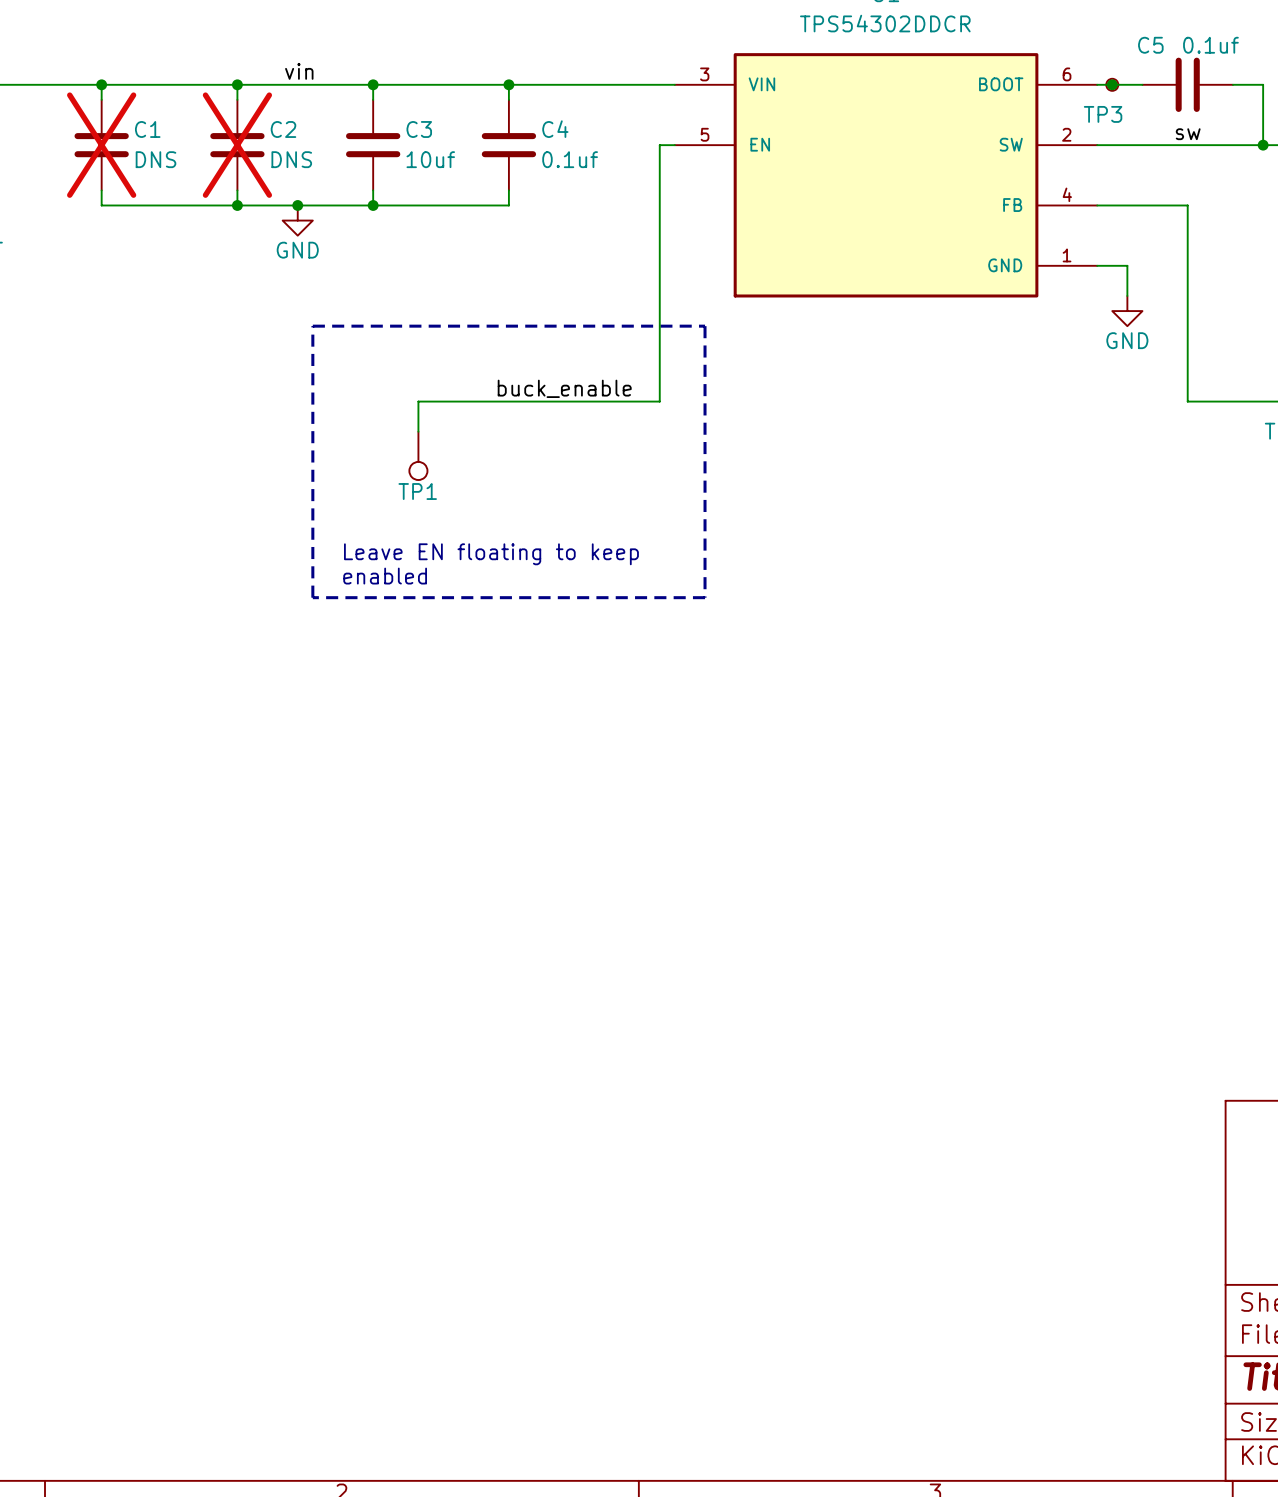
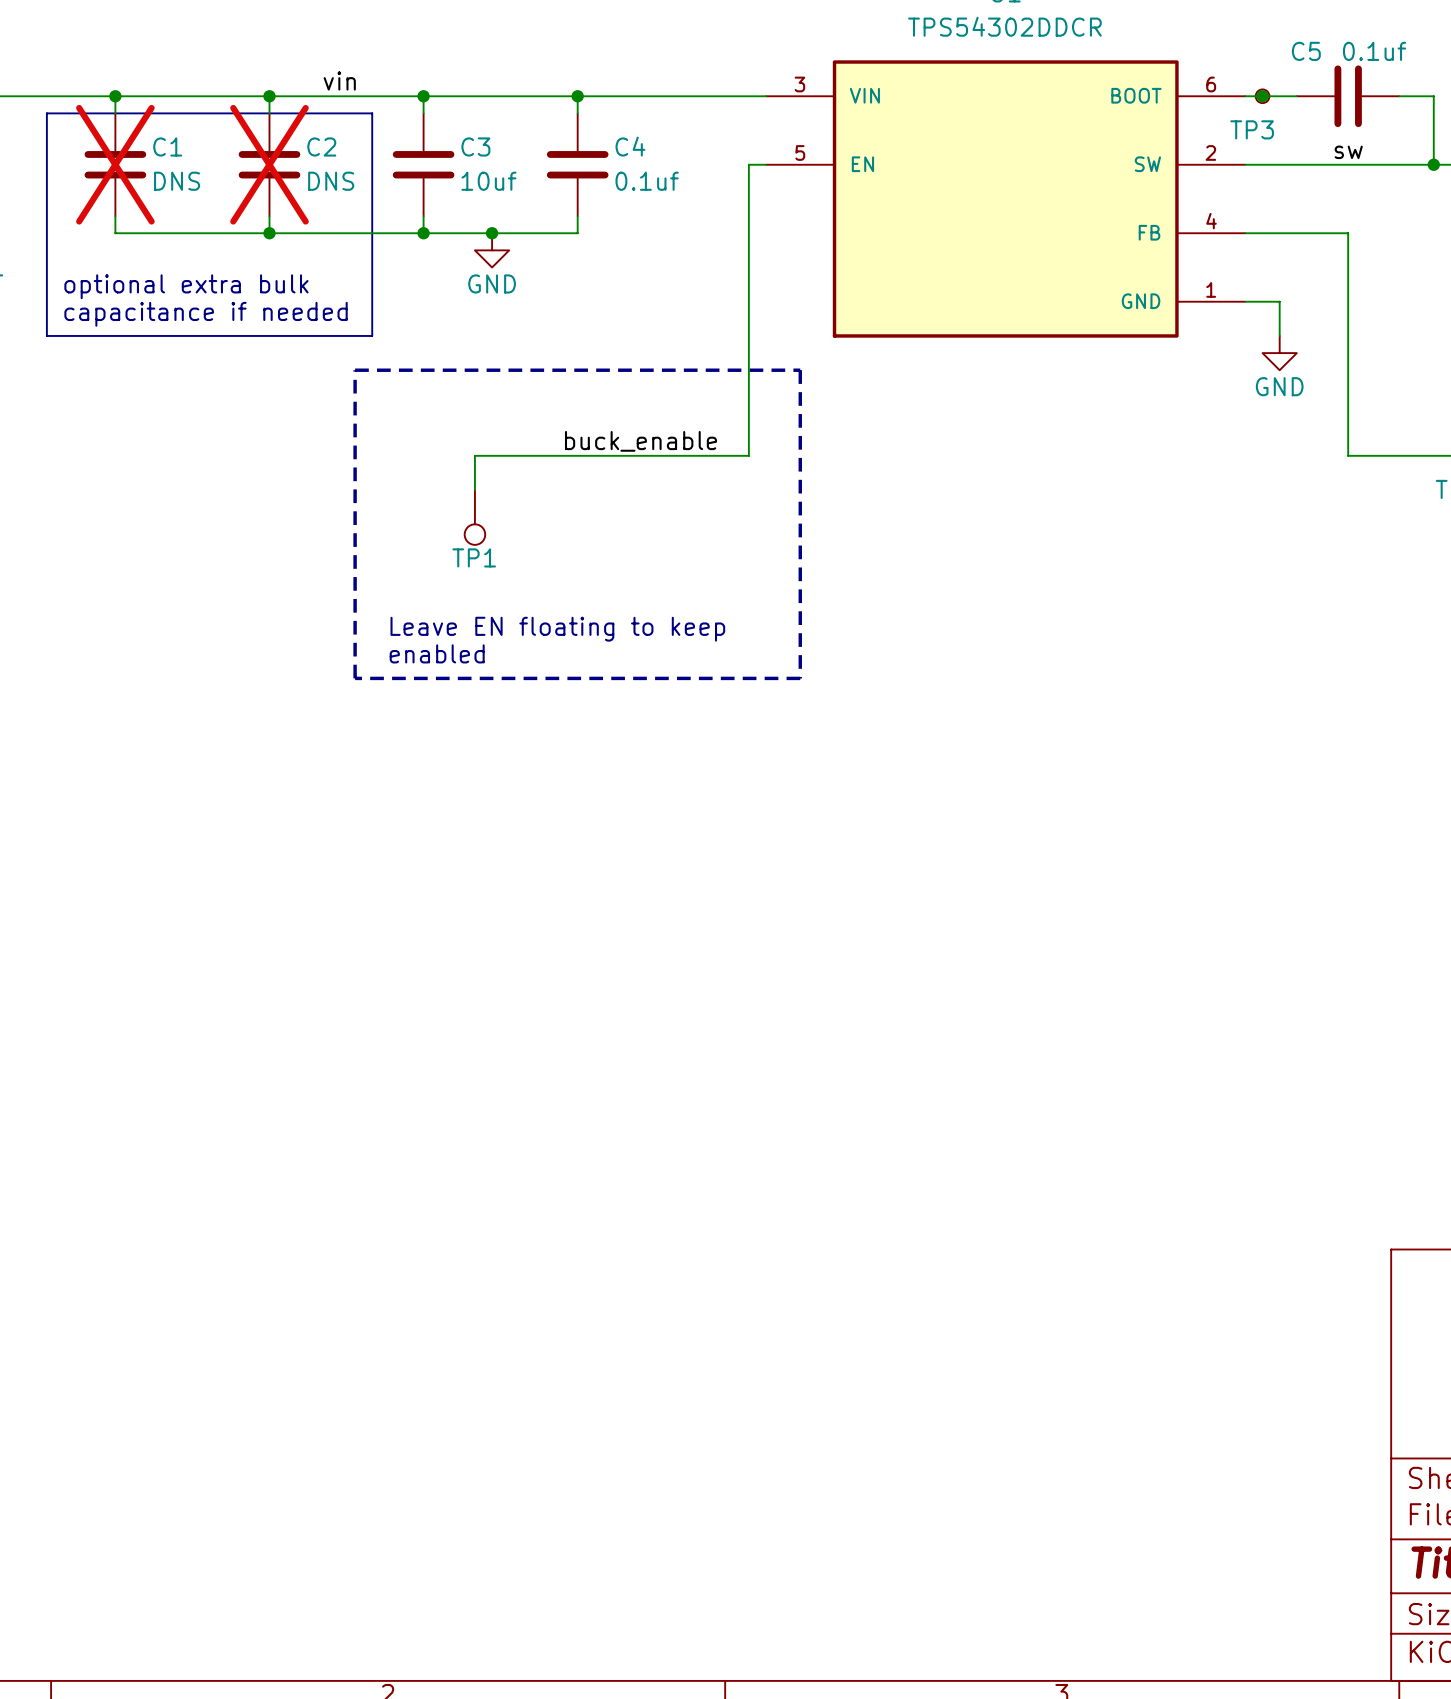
line: none -> (46, 113) (372, 113) (372, 335) (46, 335) (46, 113)
junction: (297, 205) -> none
junction: none -> (492, 233)
power symbol position: GND (297, 220) -> GND (492, 250)
text: none -> optional extra bulk (186, 286)
text: none -> capacitance if needed (206, 314)

